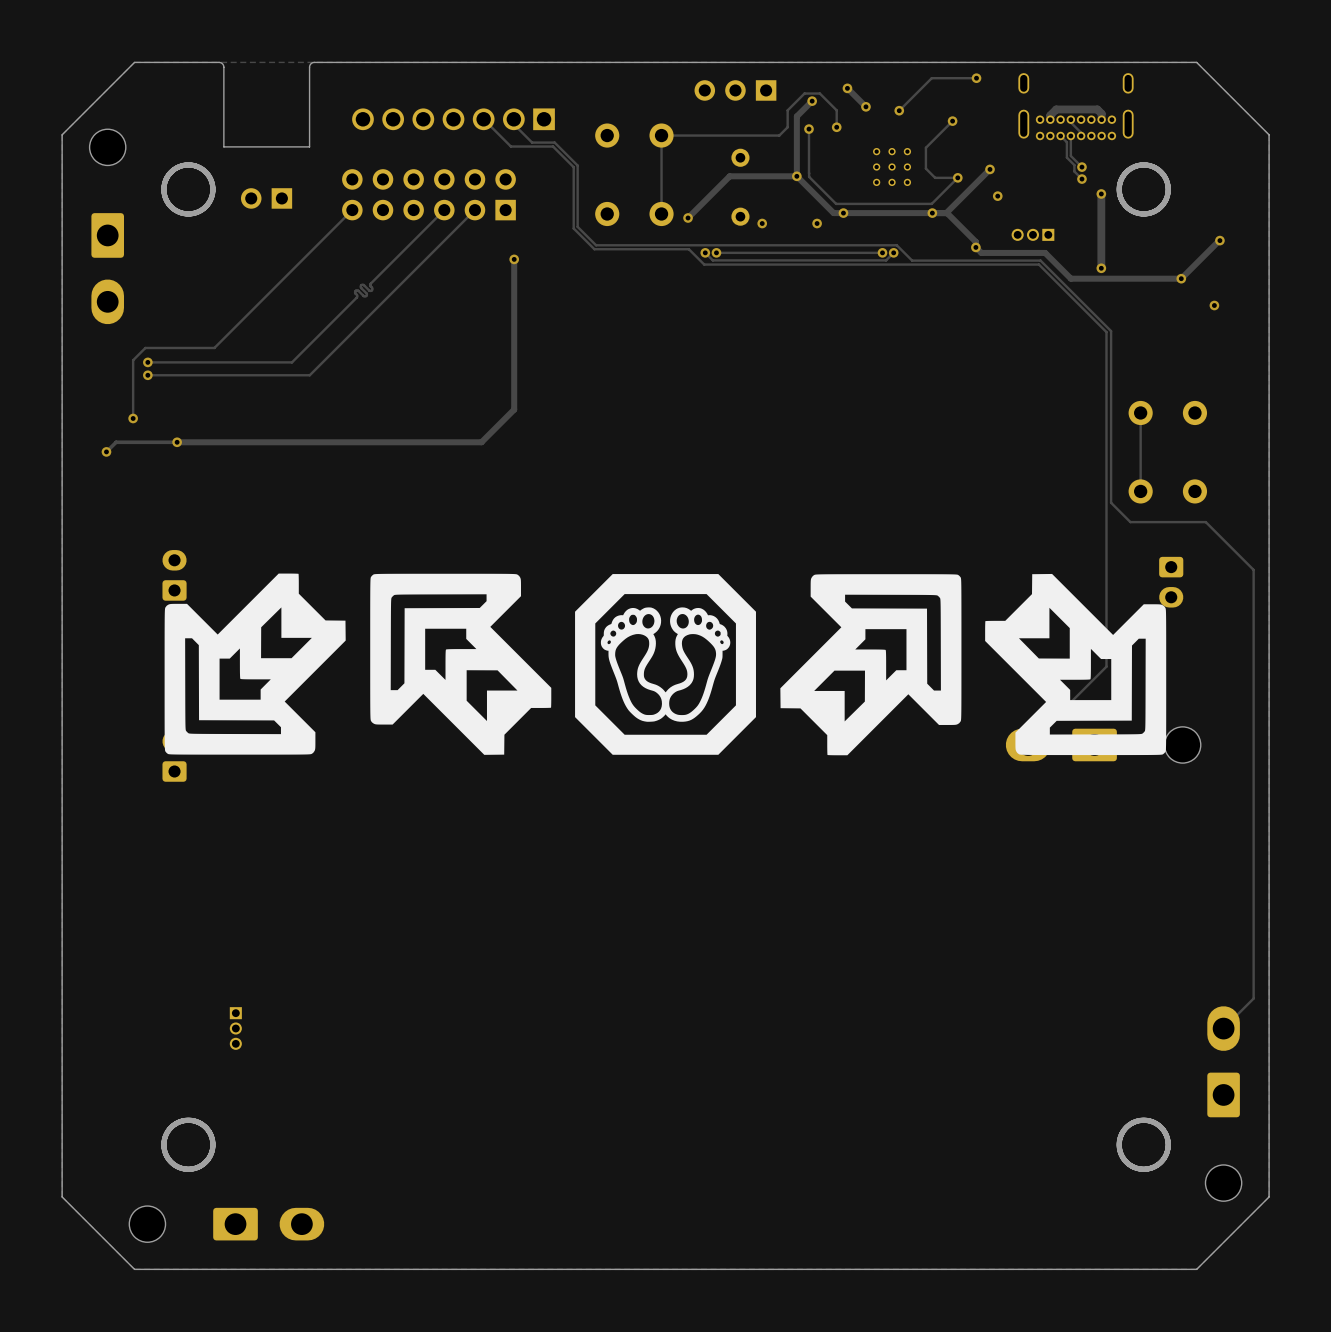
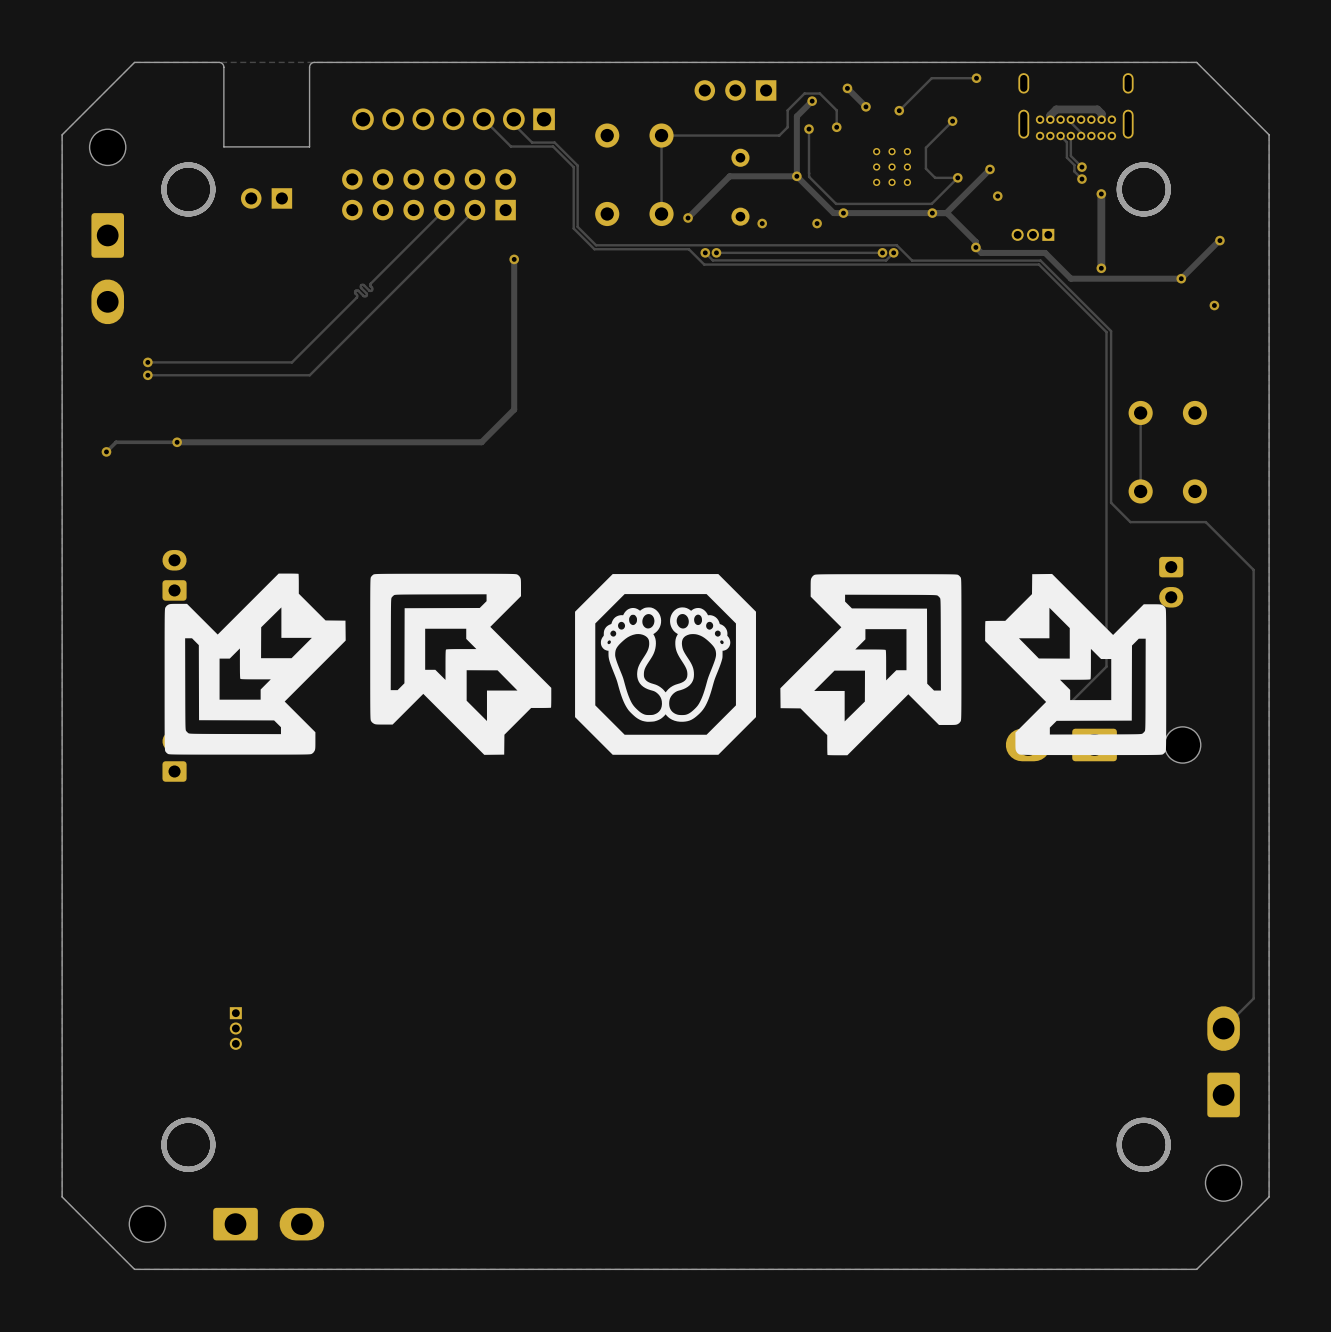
track: (352, 210) (214, 347) (145, 347) (133, 360) (133, 418) -> none
via: (133, 418) -> none

